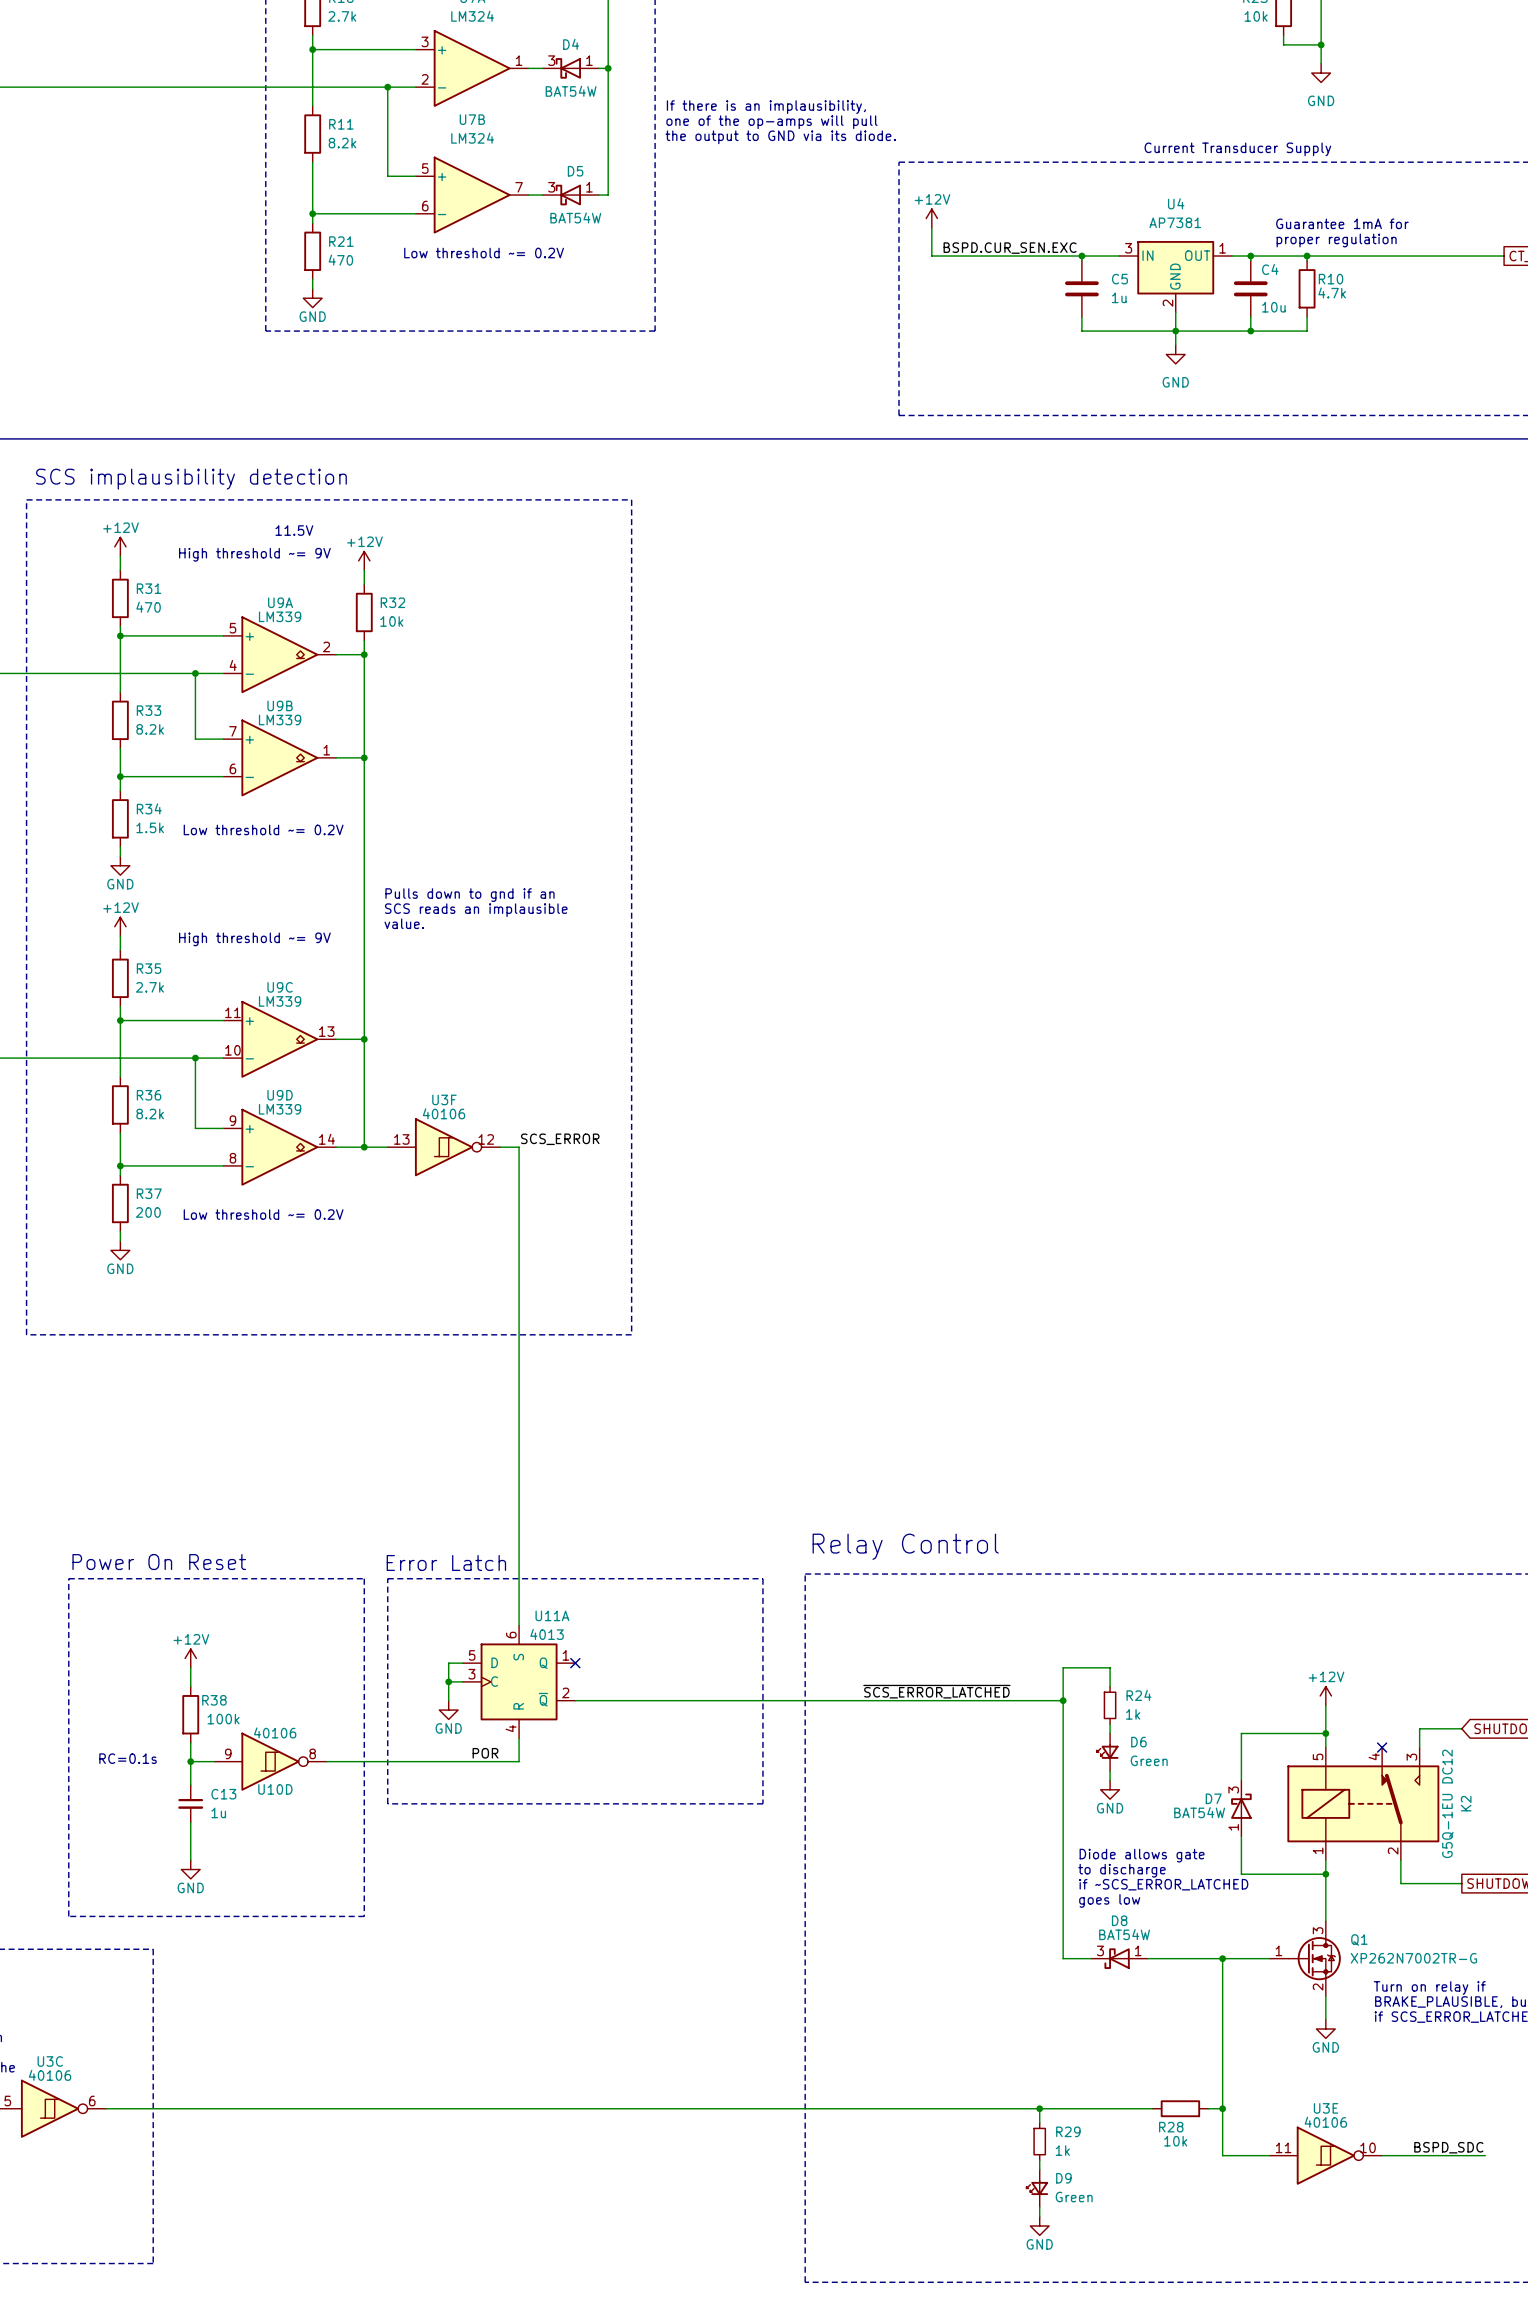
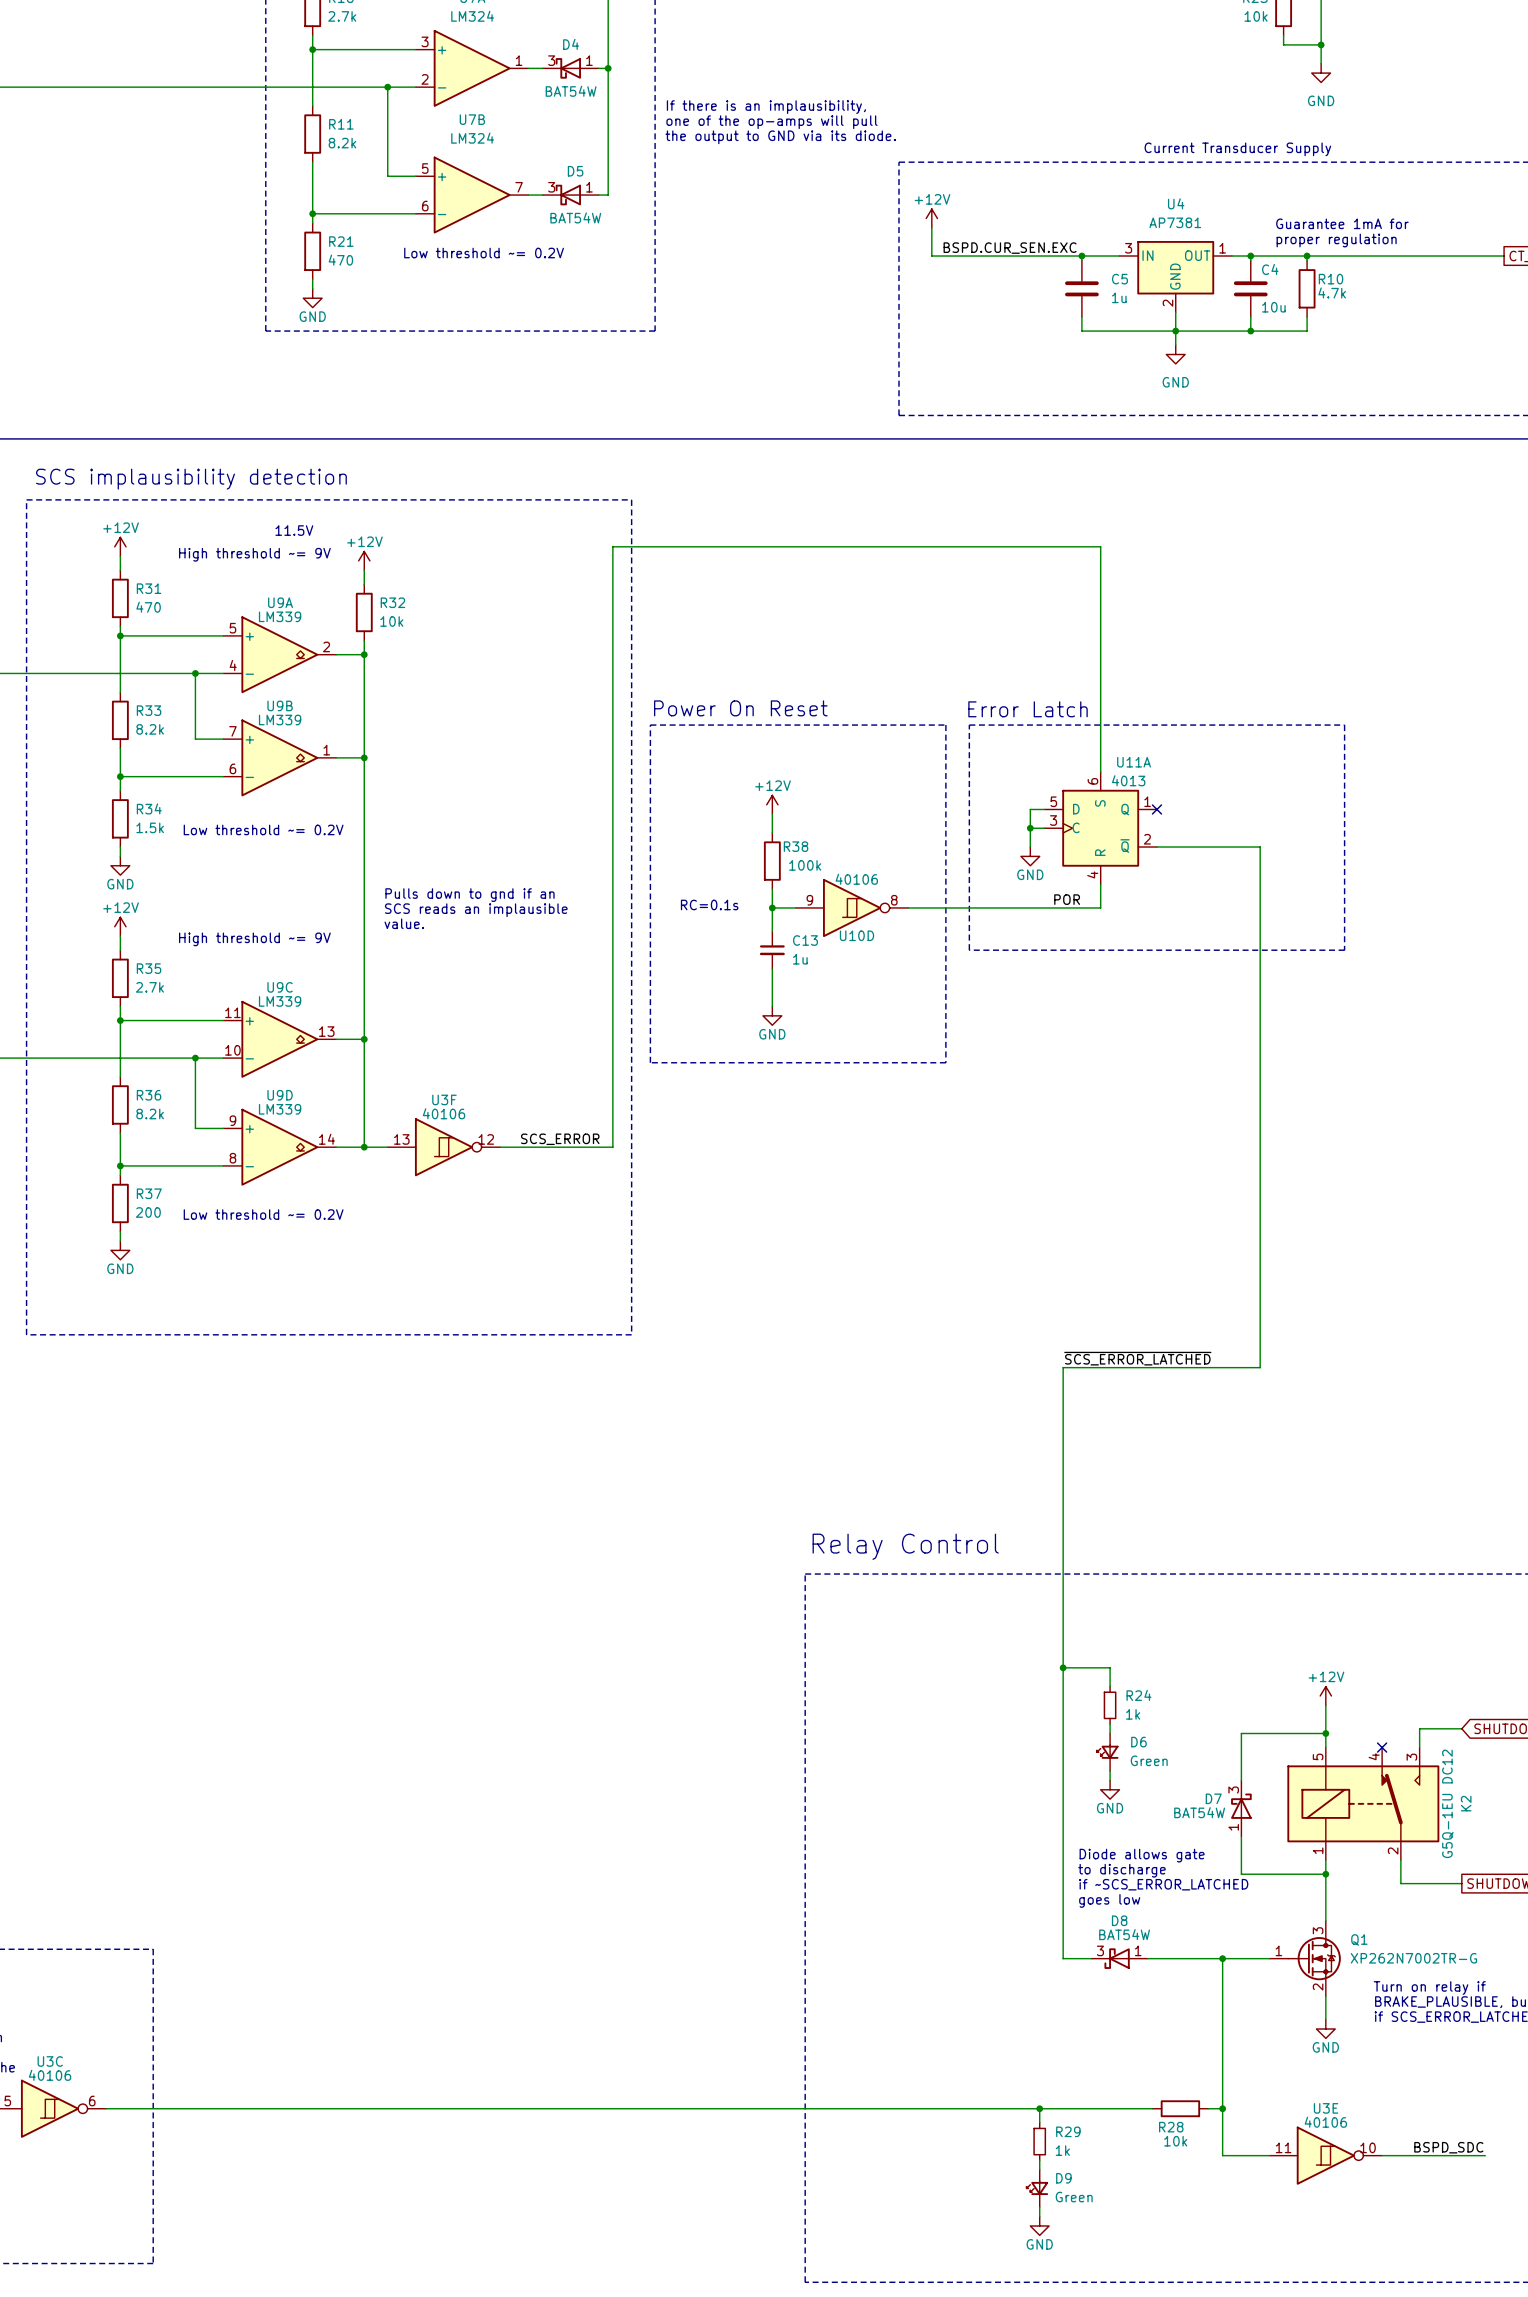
text: none -> Power On Reset (740, 708)
text: none -> Error Latch (1028, 709)
line: none -> (650, 725) (945, 725) (945, 1062) (650, 1062) (650, 725)
line: none -> (969, 725) (1344, 725) (1344, 950) (969, 950) (969, 725)
power symbol: none -> +12V (772, 804)
wire: none -> (1044, 809) (1030, 809) (1030, 847)
no-connect mark: none -> (1156, 809)
wire: none -> (772, 814) (772, 832)
wire: none -> (1030, 828) (1044, 828)
junction: none -> (1030, 828)
wire: none -> (1156, 847) (1260, 847) (1260, 1367) (1063, 1367) (1063, 1667)
power symbol: none -> GND (1030, 856)
wire: none -> (1100, 884) (1100, 907) (908, 907)
wire: none -> (772, 889) (772, 931)
label: none -> POR (1067, 899)
text: none -> RC=0.1s (709, 904)
wire: none -> (772, 907) (795, 907)
junction: none -> (772, 907)
wire: none -> (772, 968) (772, 1006)
power symbol: none -> GND (772, 1015)
wire: (519, 1147) (519, 1625) -> (519, 1147) (612, 1147) (612, 546) (1100, 546) (1100, 771)
label: none -> ~{SCS_ERROR_LATCHED} (1137, 1358)
text: Power On Reset (159, 1562) -> none
text: Error Latch (446, 1562) -> none
line: (68, 1578) (364, 1578) (364, 1916) (68, 1916) (68, 1578) -> none
line: (387, 1578) (762, 1578) (762, 1803) (387, 1803) (387, 1578) -> none
power symbol: +12V (190, 1658) -> none
wire: (462, 1663) (448, 1663) (448, 1700) -> none
no-connect mark: (575, 1663) -> none
wire: (190, 1667) (190, 1686) -> none
wire: (448, 1681) (462, 1681) -> none
junction: (448, 1681) -> none
U11A position: (519, 1681) -> (1100, 828)
label: ~{SCS_ERROR_LATCHED} (936, 1691) -> none
wire: (575, 1700) (1063, 1700) -> none
junction position: (1063, 1700) -> (1063, 1667)
power symbol: GND (448, 1710) -> none
R38 position: (190, 1714) -> (772, 861)
wire: (519, 1738) (519, 1761) (326, 1761) -> none
wire: (190, 1742) (190, 1785) -> none
label: POR (485, 1753) -> none
text: RC=0.1s (128, 1758) -> none
wire: (190, 1761) (214, 1761) -> none
junction: (190, 1761) -> none
U10D position: (270, 1761) -> (852, 907)
C13 position: (190, 1803) -> (772, 950)
wire: (190, 1822) (190, 1860) -> none
power symbol: GND (190, 1869) -> none

